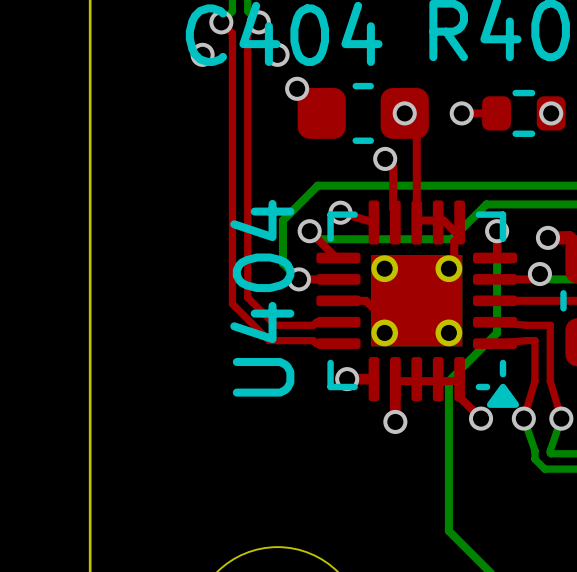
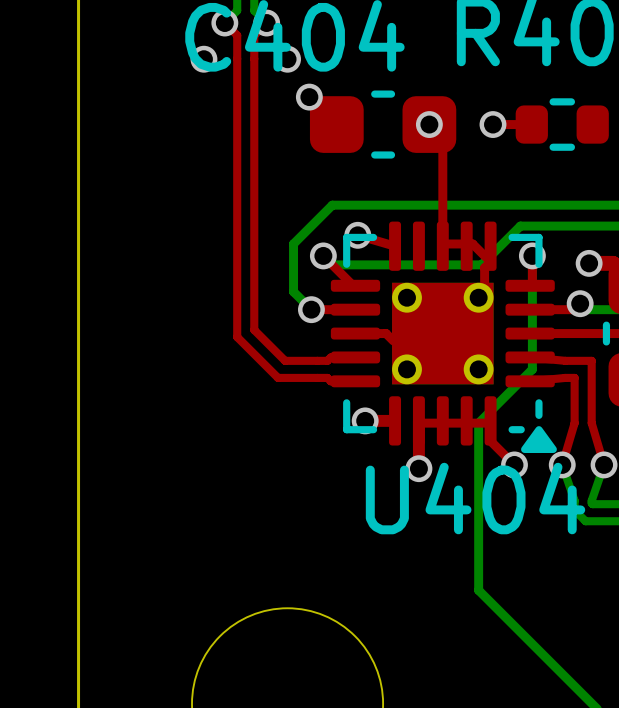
via: (551, 113) -> none
top track: (385, 158) (393, 166) (393, 209) -> none
via: (385, 158) -> none
U404 name rotation: 0° (262, 298) -> 90° clockwise (475, 498)

